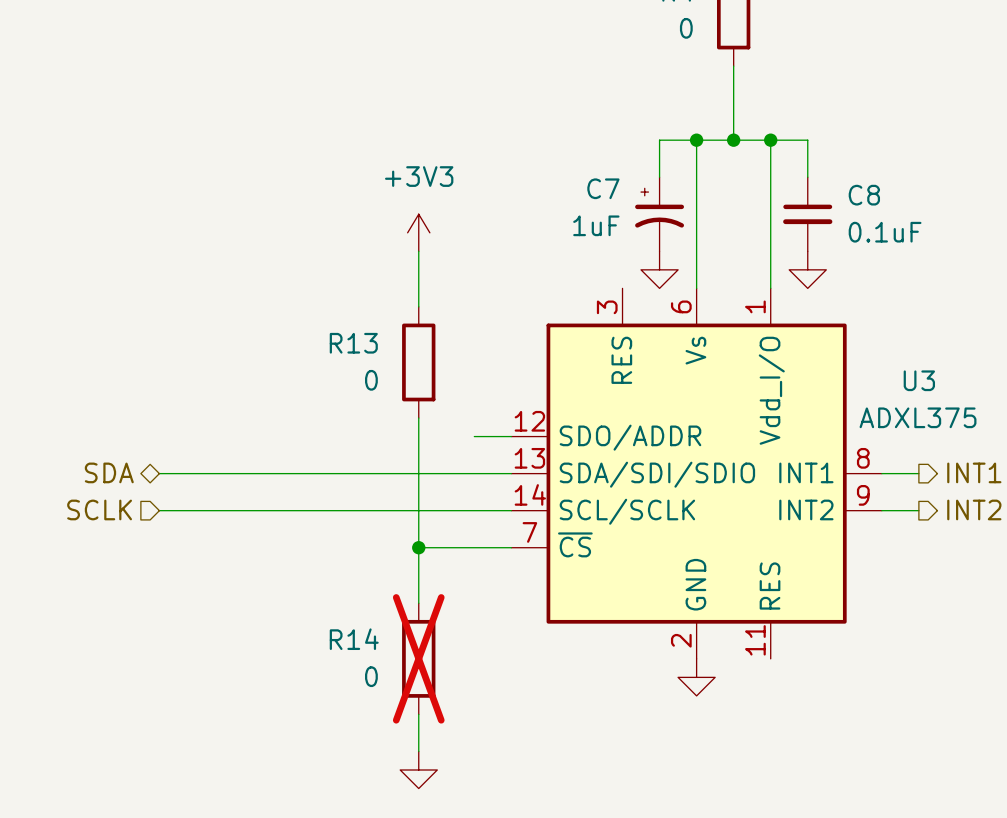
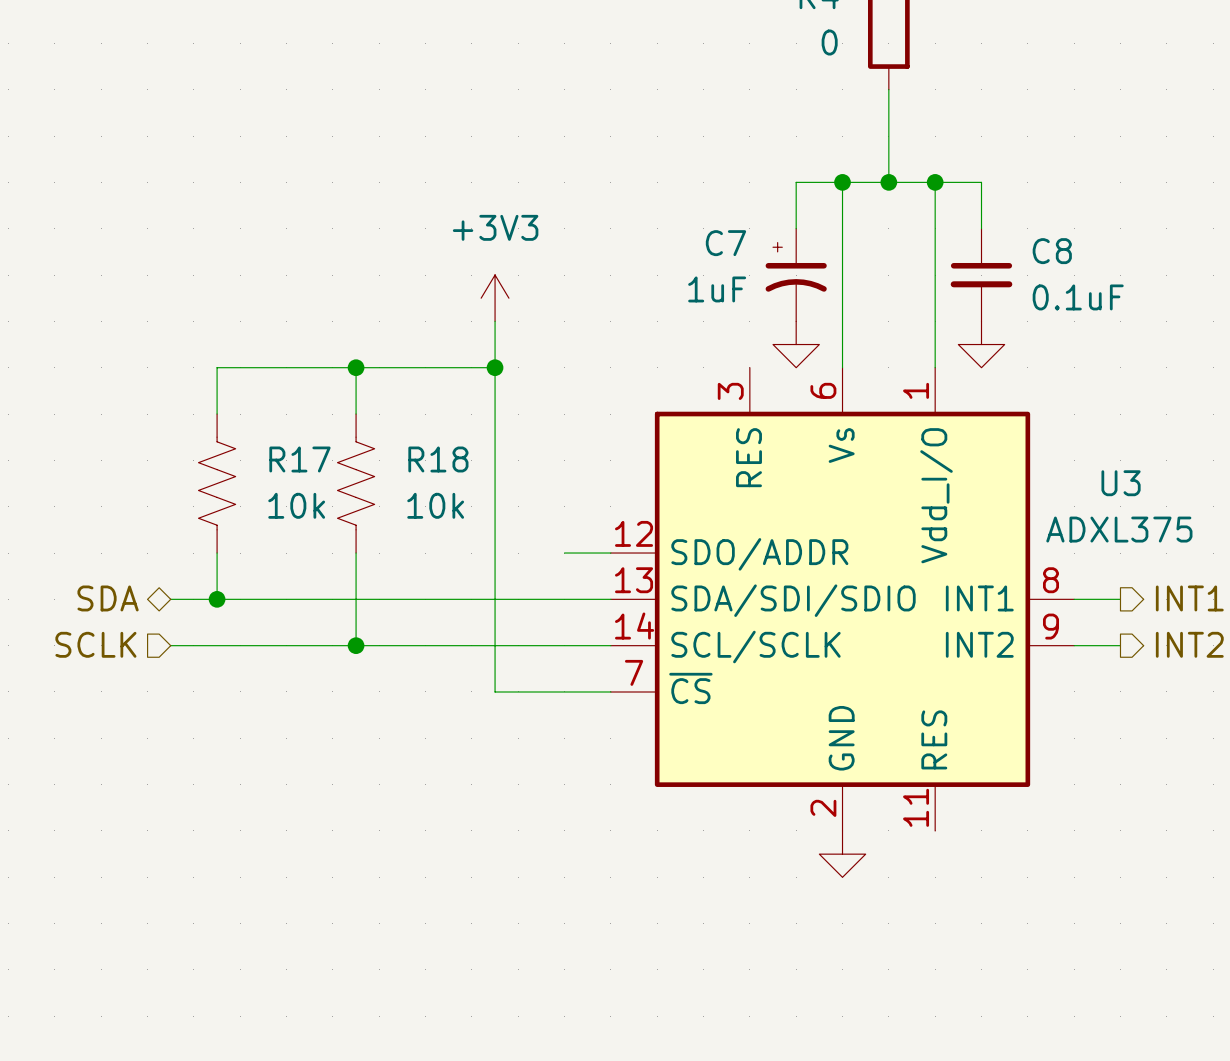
wire: none -> (356, 367) (356, 414)
junction: none -> (356, 367)
wire: none -> (495, 367) (217, 367) (217, 414)
junction: none -> (495, 367)
wire: none -> (495, 390) (495, 529)
R13: 0 (418, 362) -> none
R17: none -> 10k (217, 483)
R18: none -> 10k (356, 483)
wire: none -> (356, 553) (356, 645)
junction: none -> (217, 599)
junction: none -> (356, 645)
wire: (418, 547) (418, 603) -> none
junction: (418, 547) -> none
R14: 0 (418, 658) -> none
wire: (418, 714) (418, 751) -> (217, 553) (217, 599)
power symbol: (418, 770) -> none

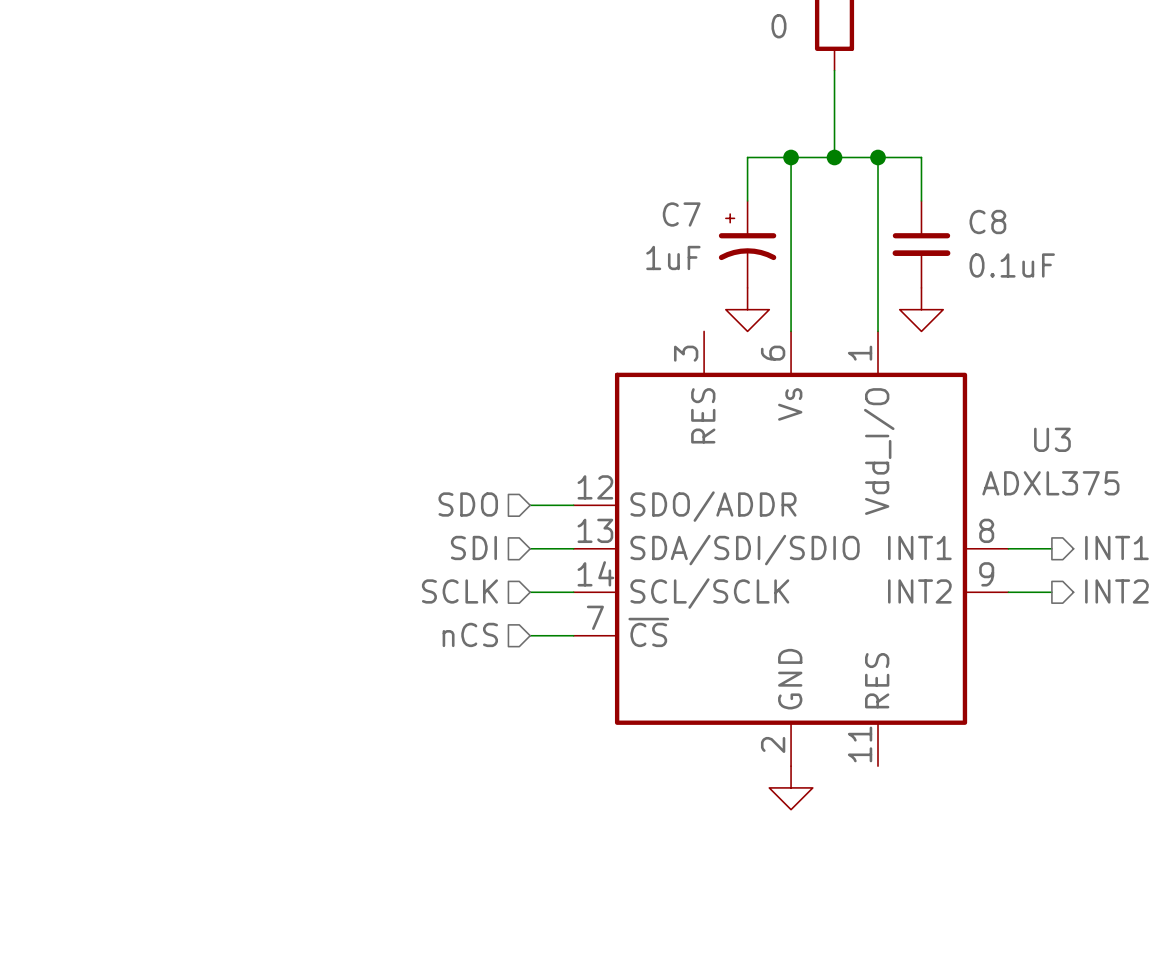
power symbol: +3V3 (495, 298) -> none
wire: (495, 321) (495, 691) (564, 691) -> none
wire: (356, 367) (356, 414) -> none
junction: (356, 367) -> none
wire: (495, 367) (217, 367) (217, 414) -> none
junction: (495, 367) -> none
R17: 10k (217, 483) -> none
R18: 10k (356, 483) -> none
hierarchical label: none -> SDO (468, 504)
wire: (217, 553) (217, 599) -> none
wire: (356, 553) (356, 645) -> none
hierarchical label: SDA (108, 598) -> none
hierarchical label: none -> SDI (473, 547)
wire: (170, 599) (564, 599) -> none
junction: (217, 599) -> none
hierarchical label position: SCLK (95, 644) -> SCLK (459, 591)
wire: (170, 645) (564, 645) -> none
junction: (356, 645) -> none
hierarchical label: none -> nCS (470, 634)

